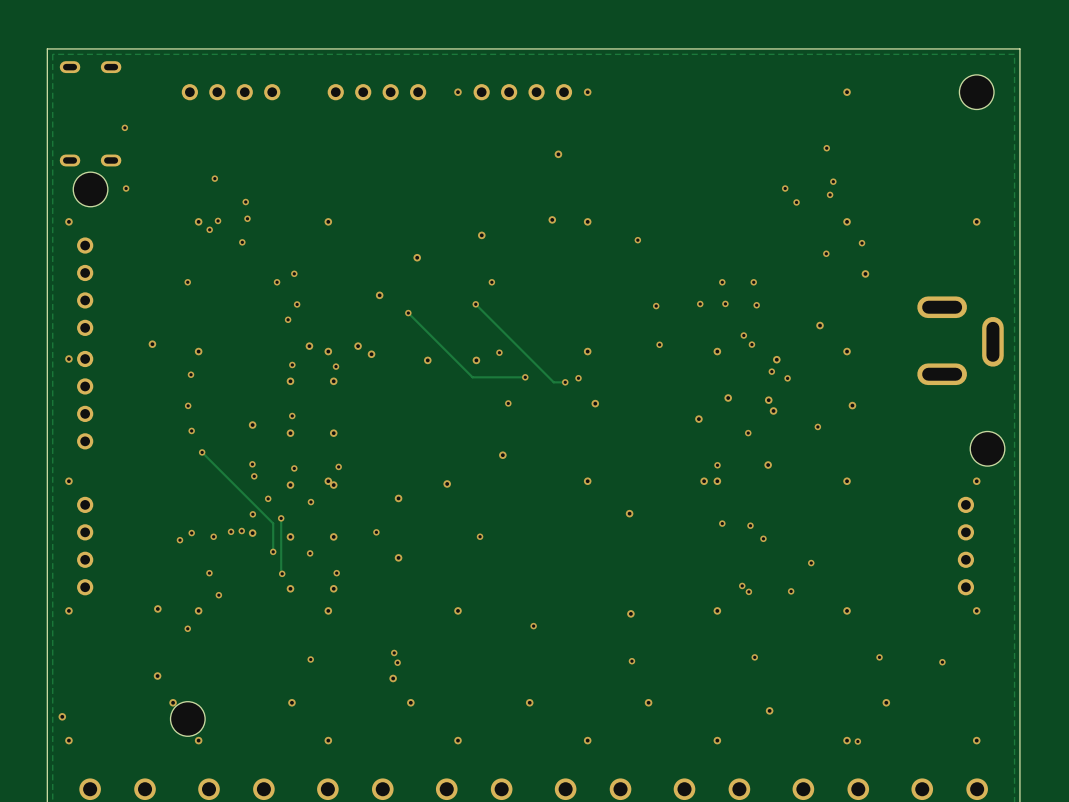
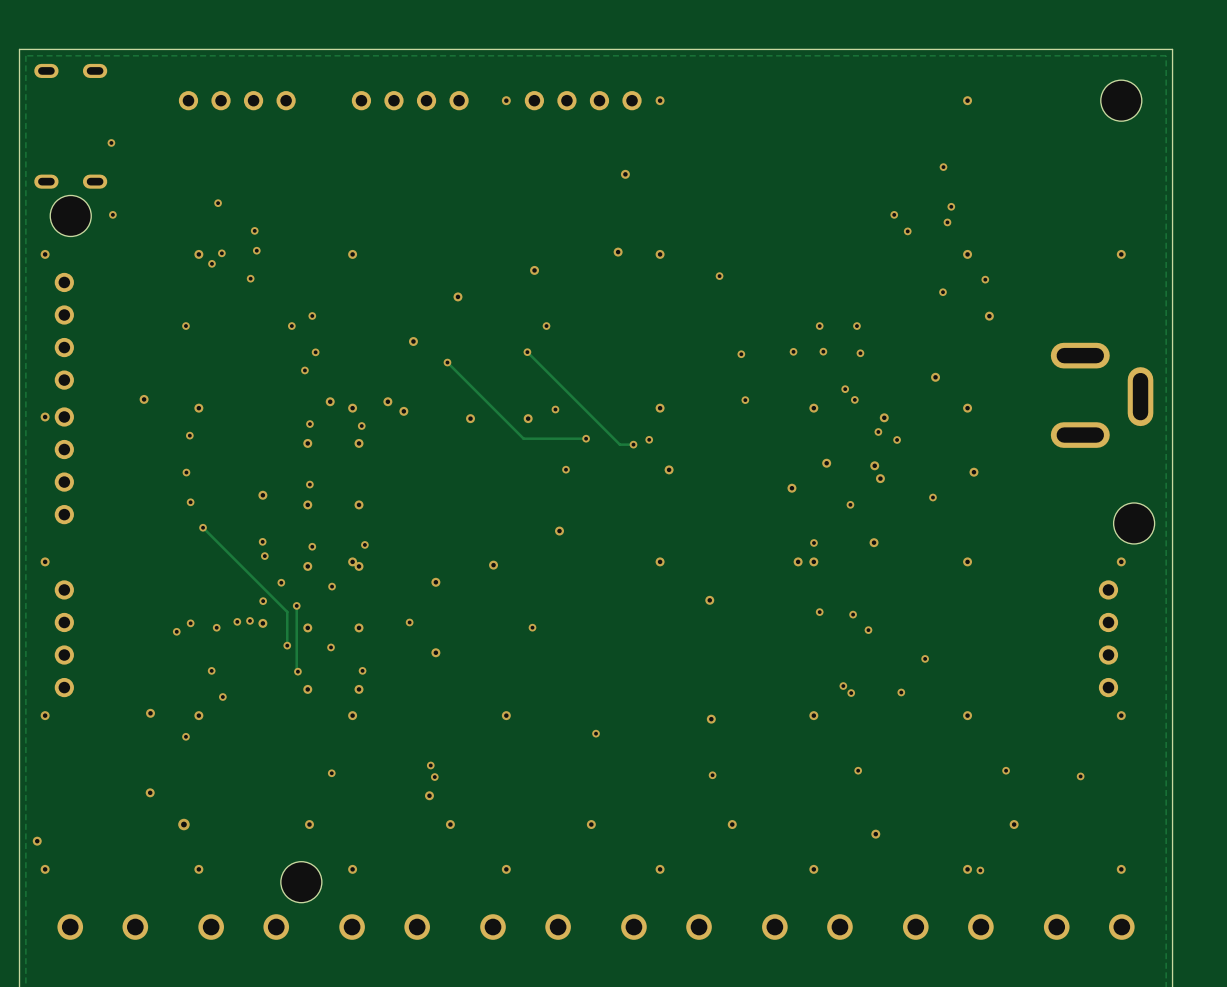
via: (173, 702) -> none
via: none -> (183, 824)
part position: (187, 718) -> (301, 882)

